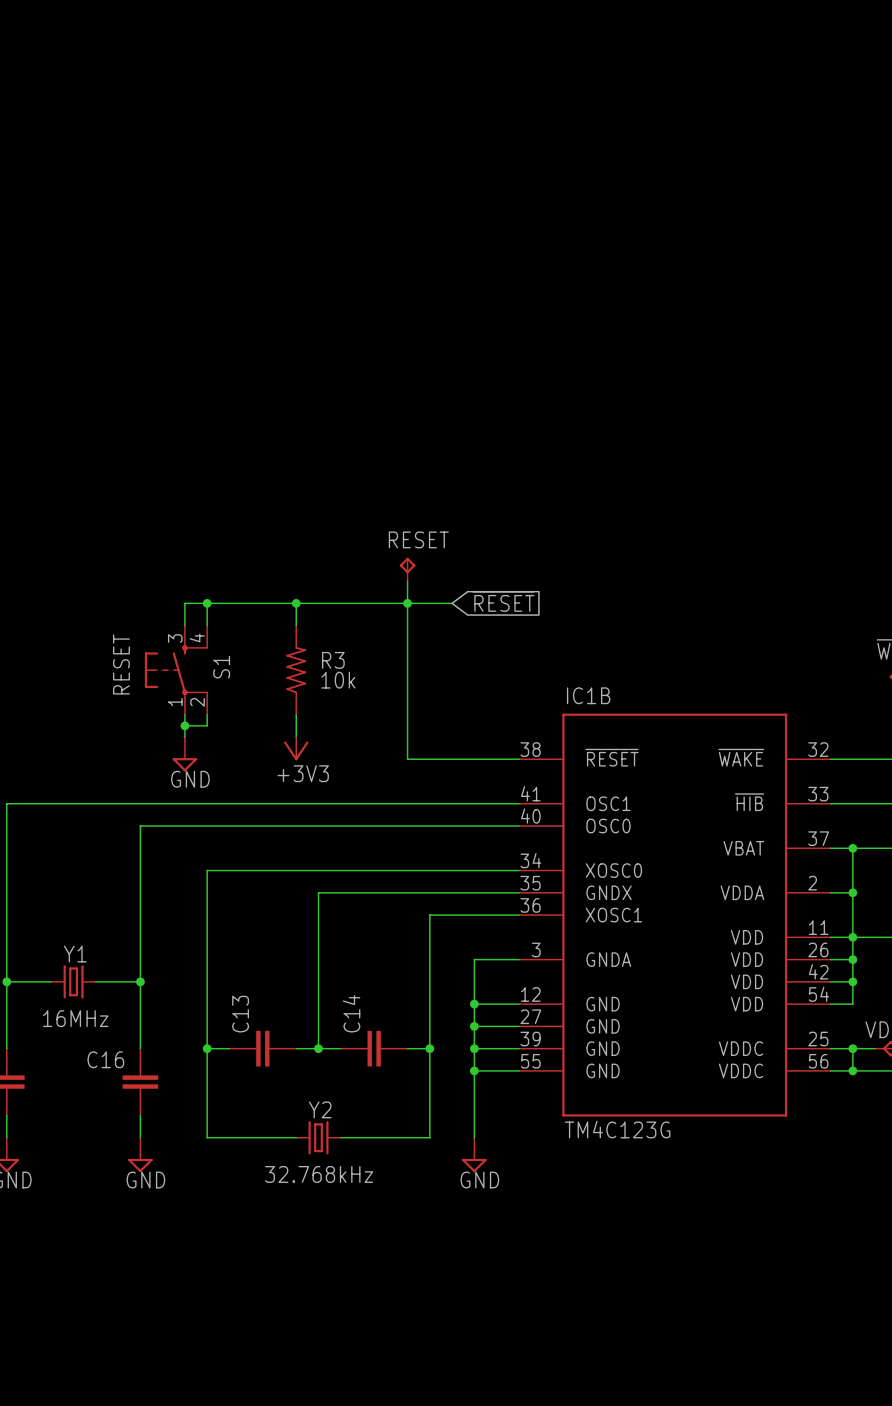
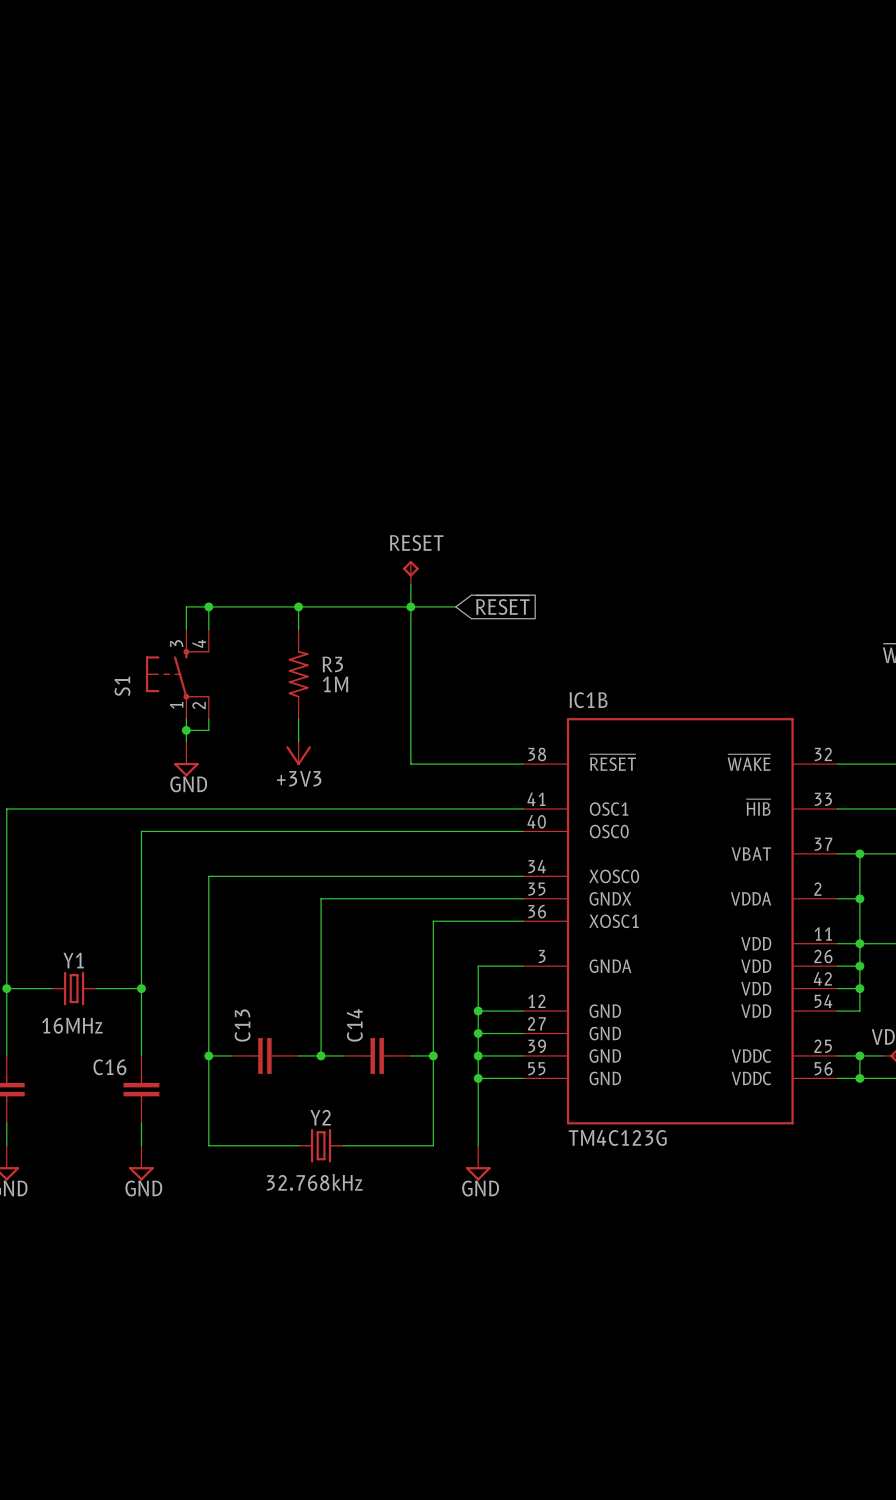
S1 value: RESET (121, 664) -> none
S1 name position: S1 (221, 667) -> S1 (122, 686)
R3 value: 10k (338, 680) -> 1M (335, 684)

